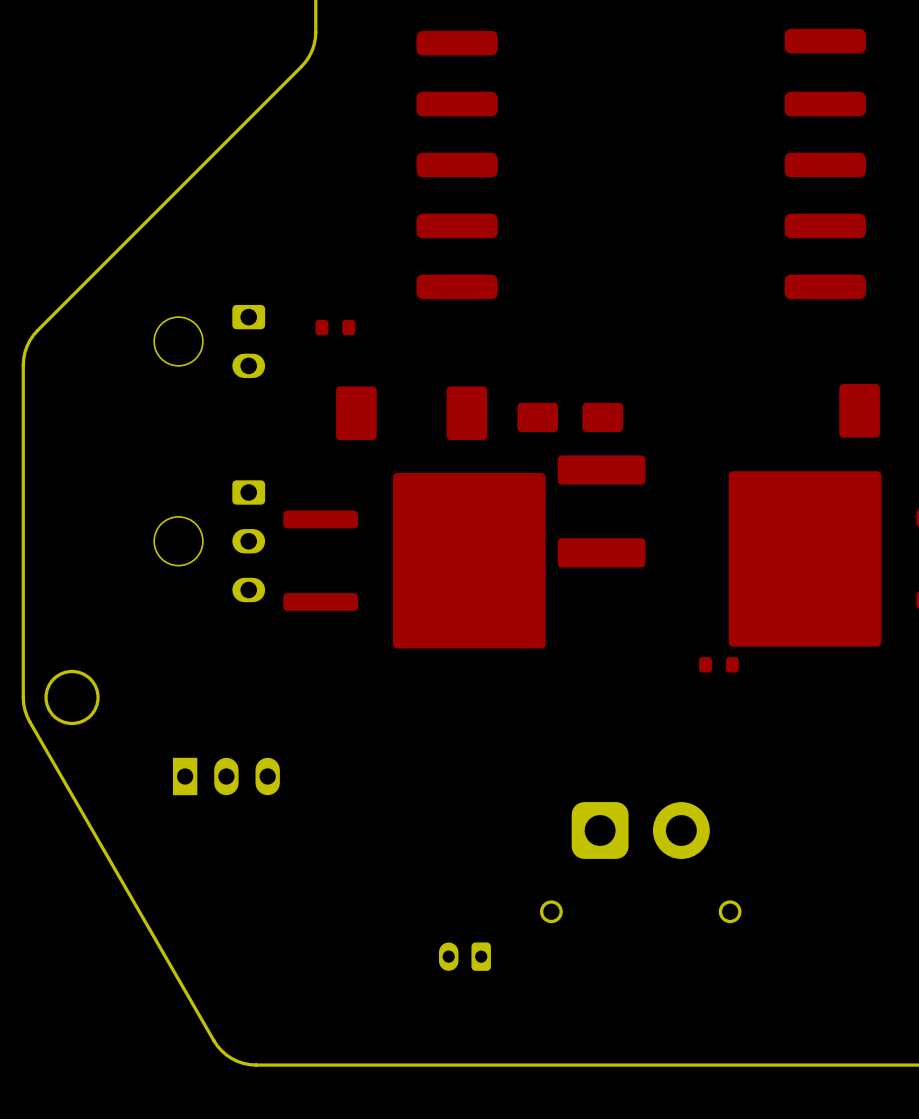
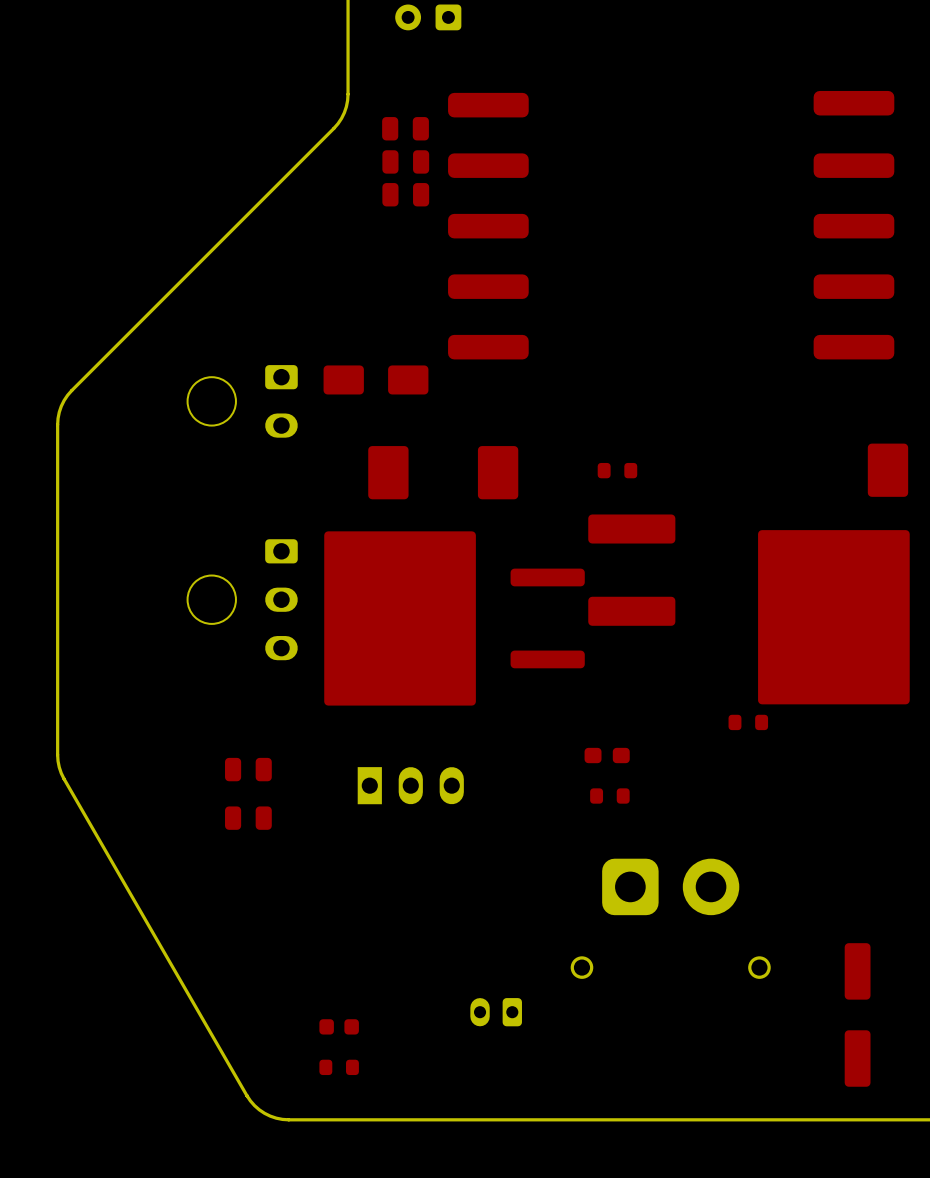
part: none -> (405, 128)
part: none -> (405, 161)
part: none -> (405, 194)
part footprint: [315, 319, 356, 336] -> [323, 365, 429, 395]
part: none -> (617, 470)
part: (570, 417) -> none
part rotation: 0° (414, 560) -> 180° (454, 618)
round board edge: [44, 669, 100, 726] -> none
part: none -> (607, 755)
part: none -> (248, 769)
part: none -> (609, 796)
part: none -> (248, 818)
part position: (226, 776) -> (410, 785)
part: none -> (857, 1014)
part: none -> (339, 1026)
part: none -> (339, 1067)

